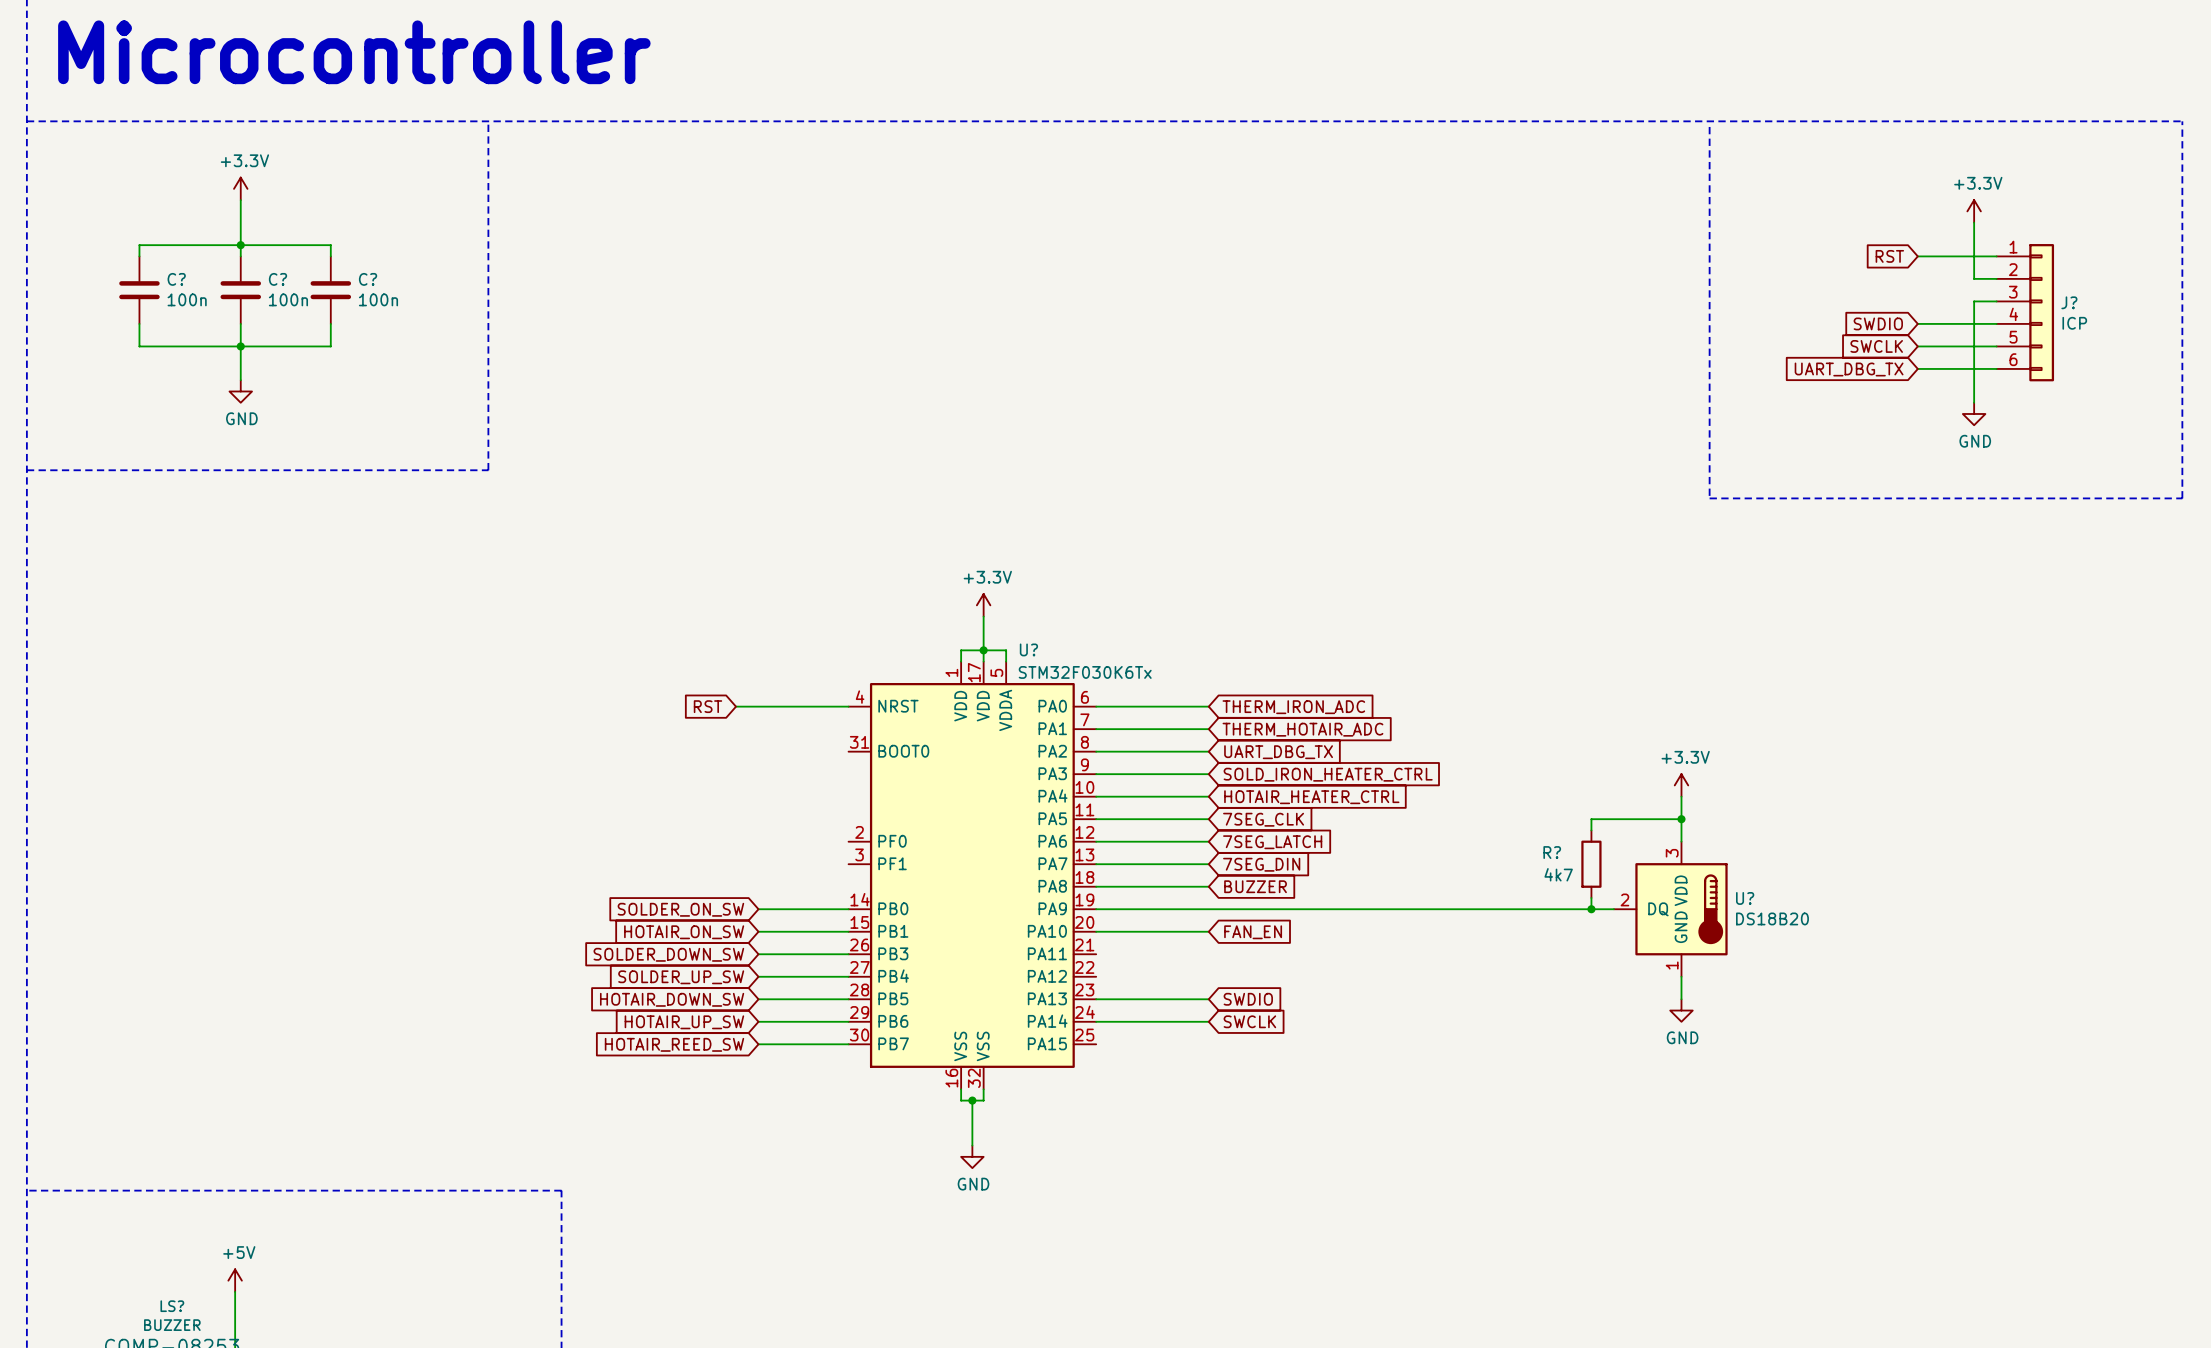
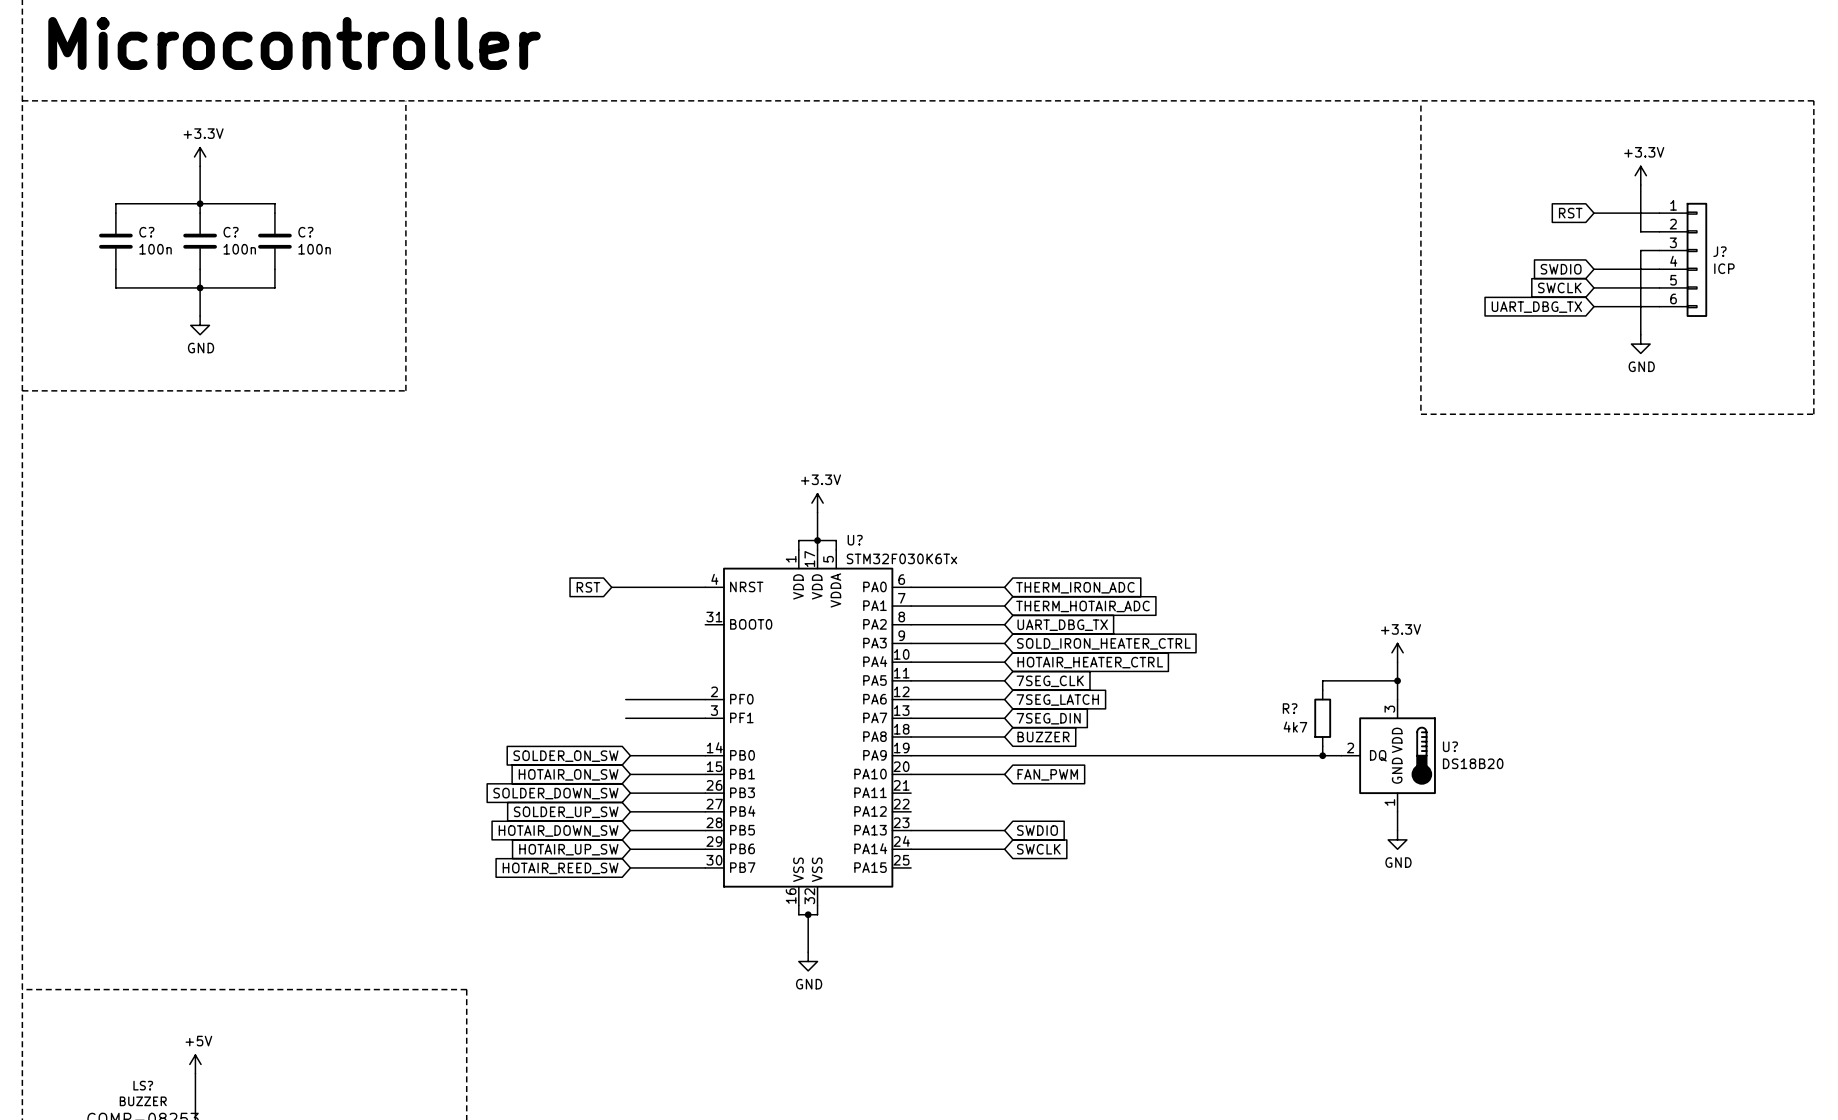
wire: none -> (625, 699) (705, 699)
wire: none -> (625, 718) (705, 718)
global label: FAN_EN (1253, 932) -> FAN_PWM (1047, 774)

